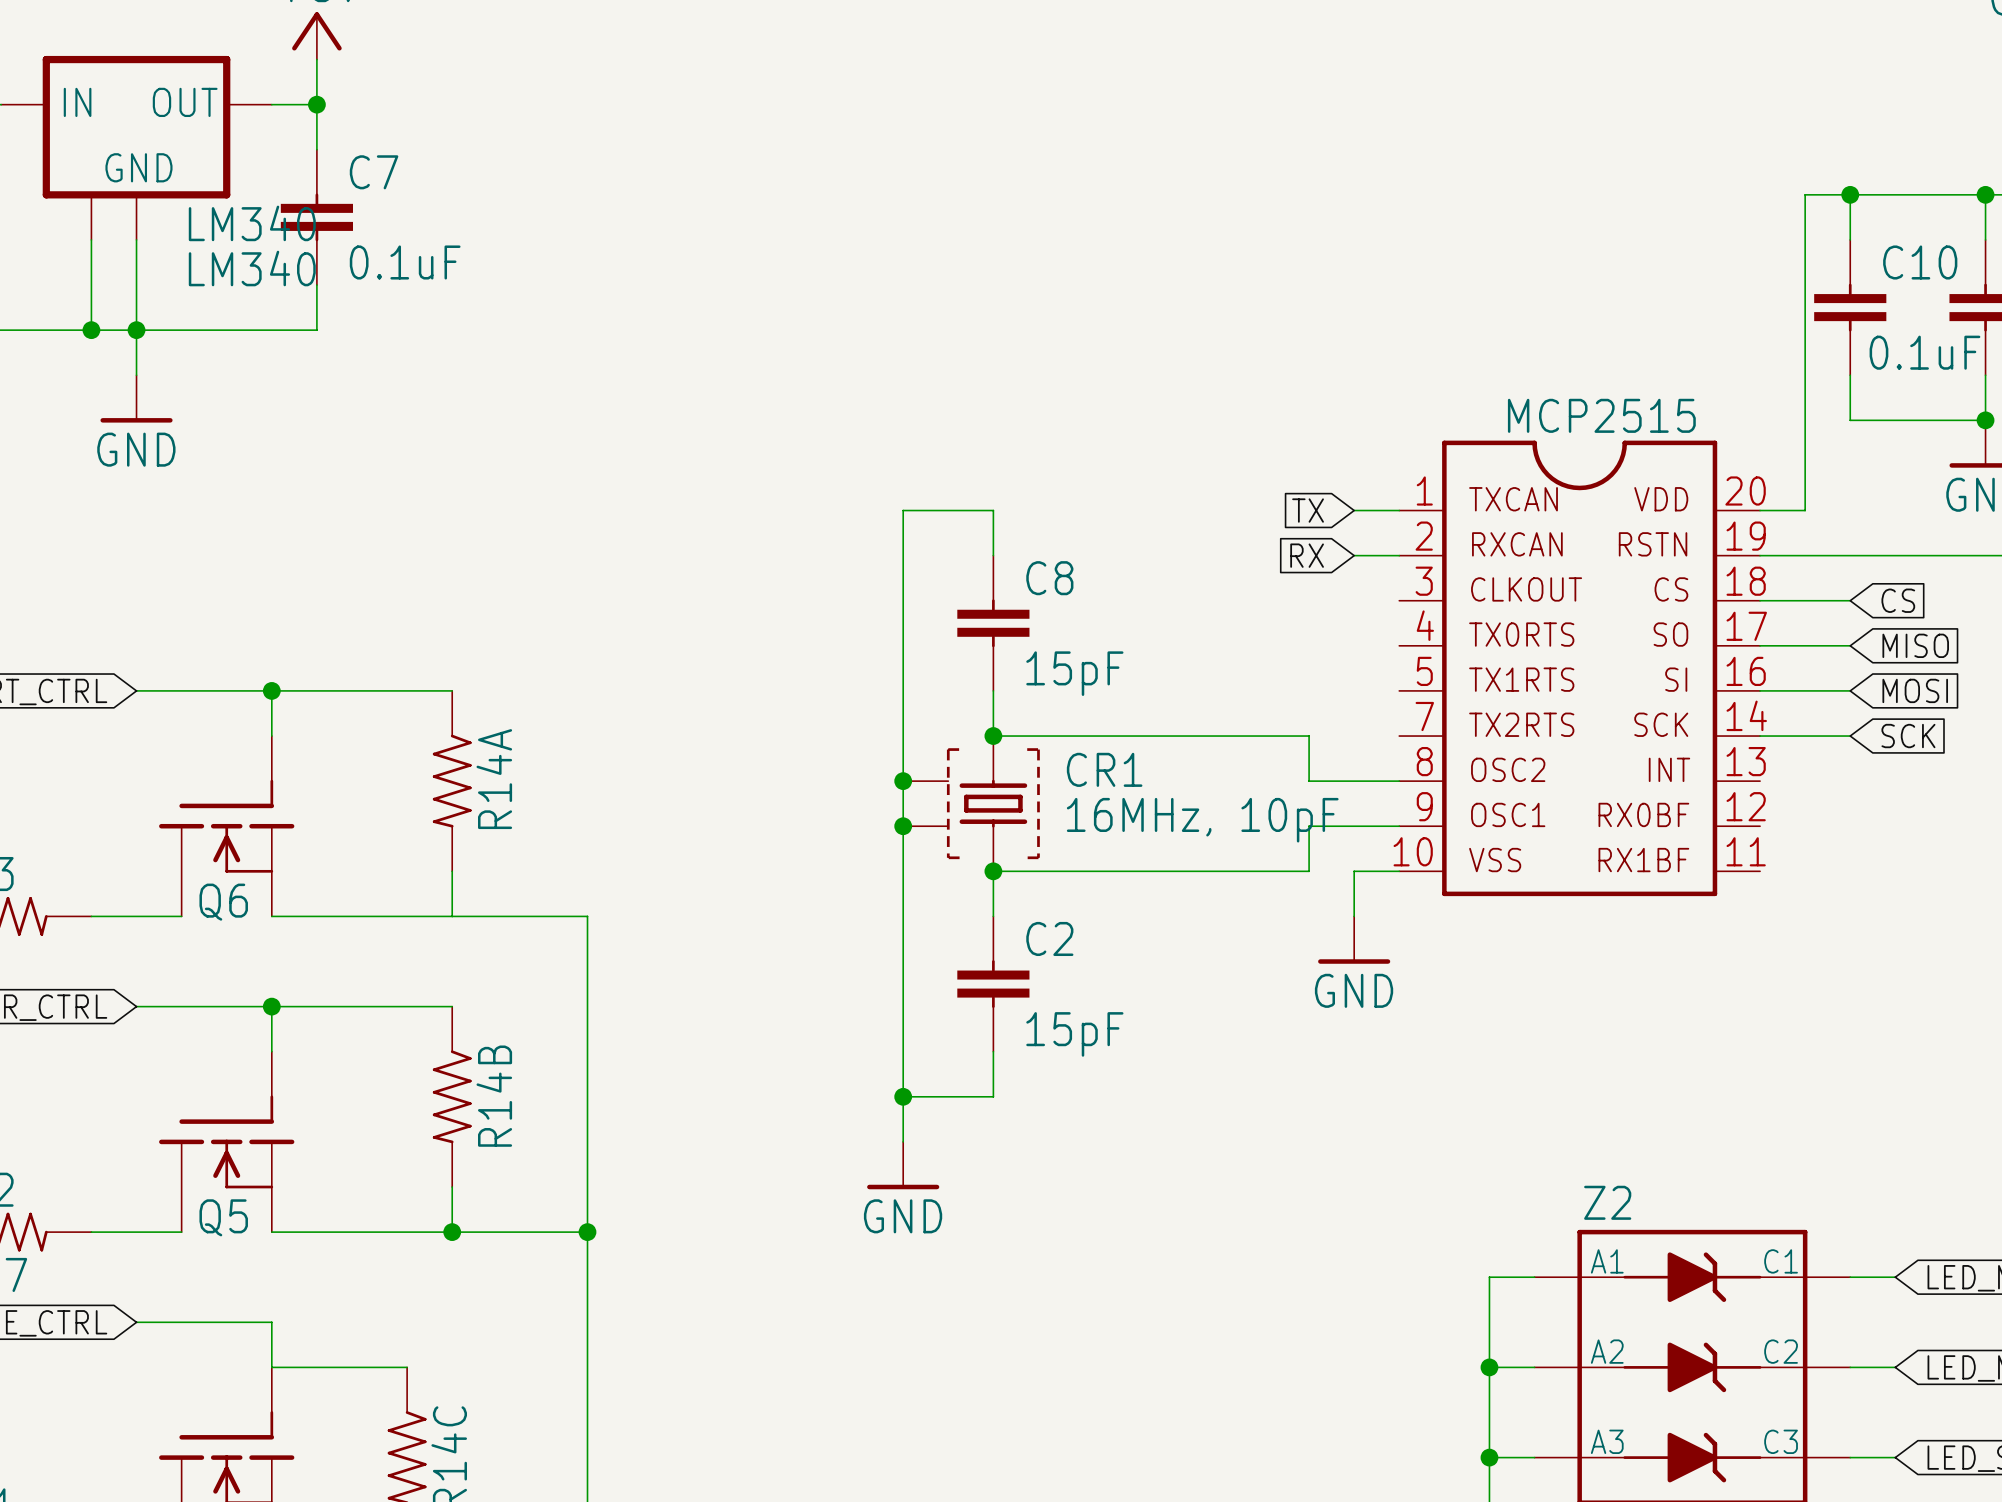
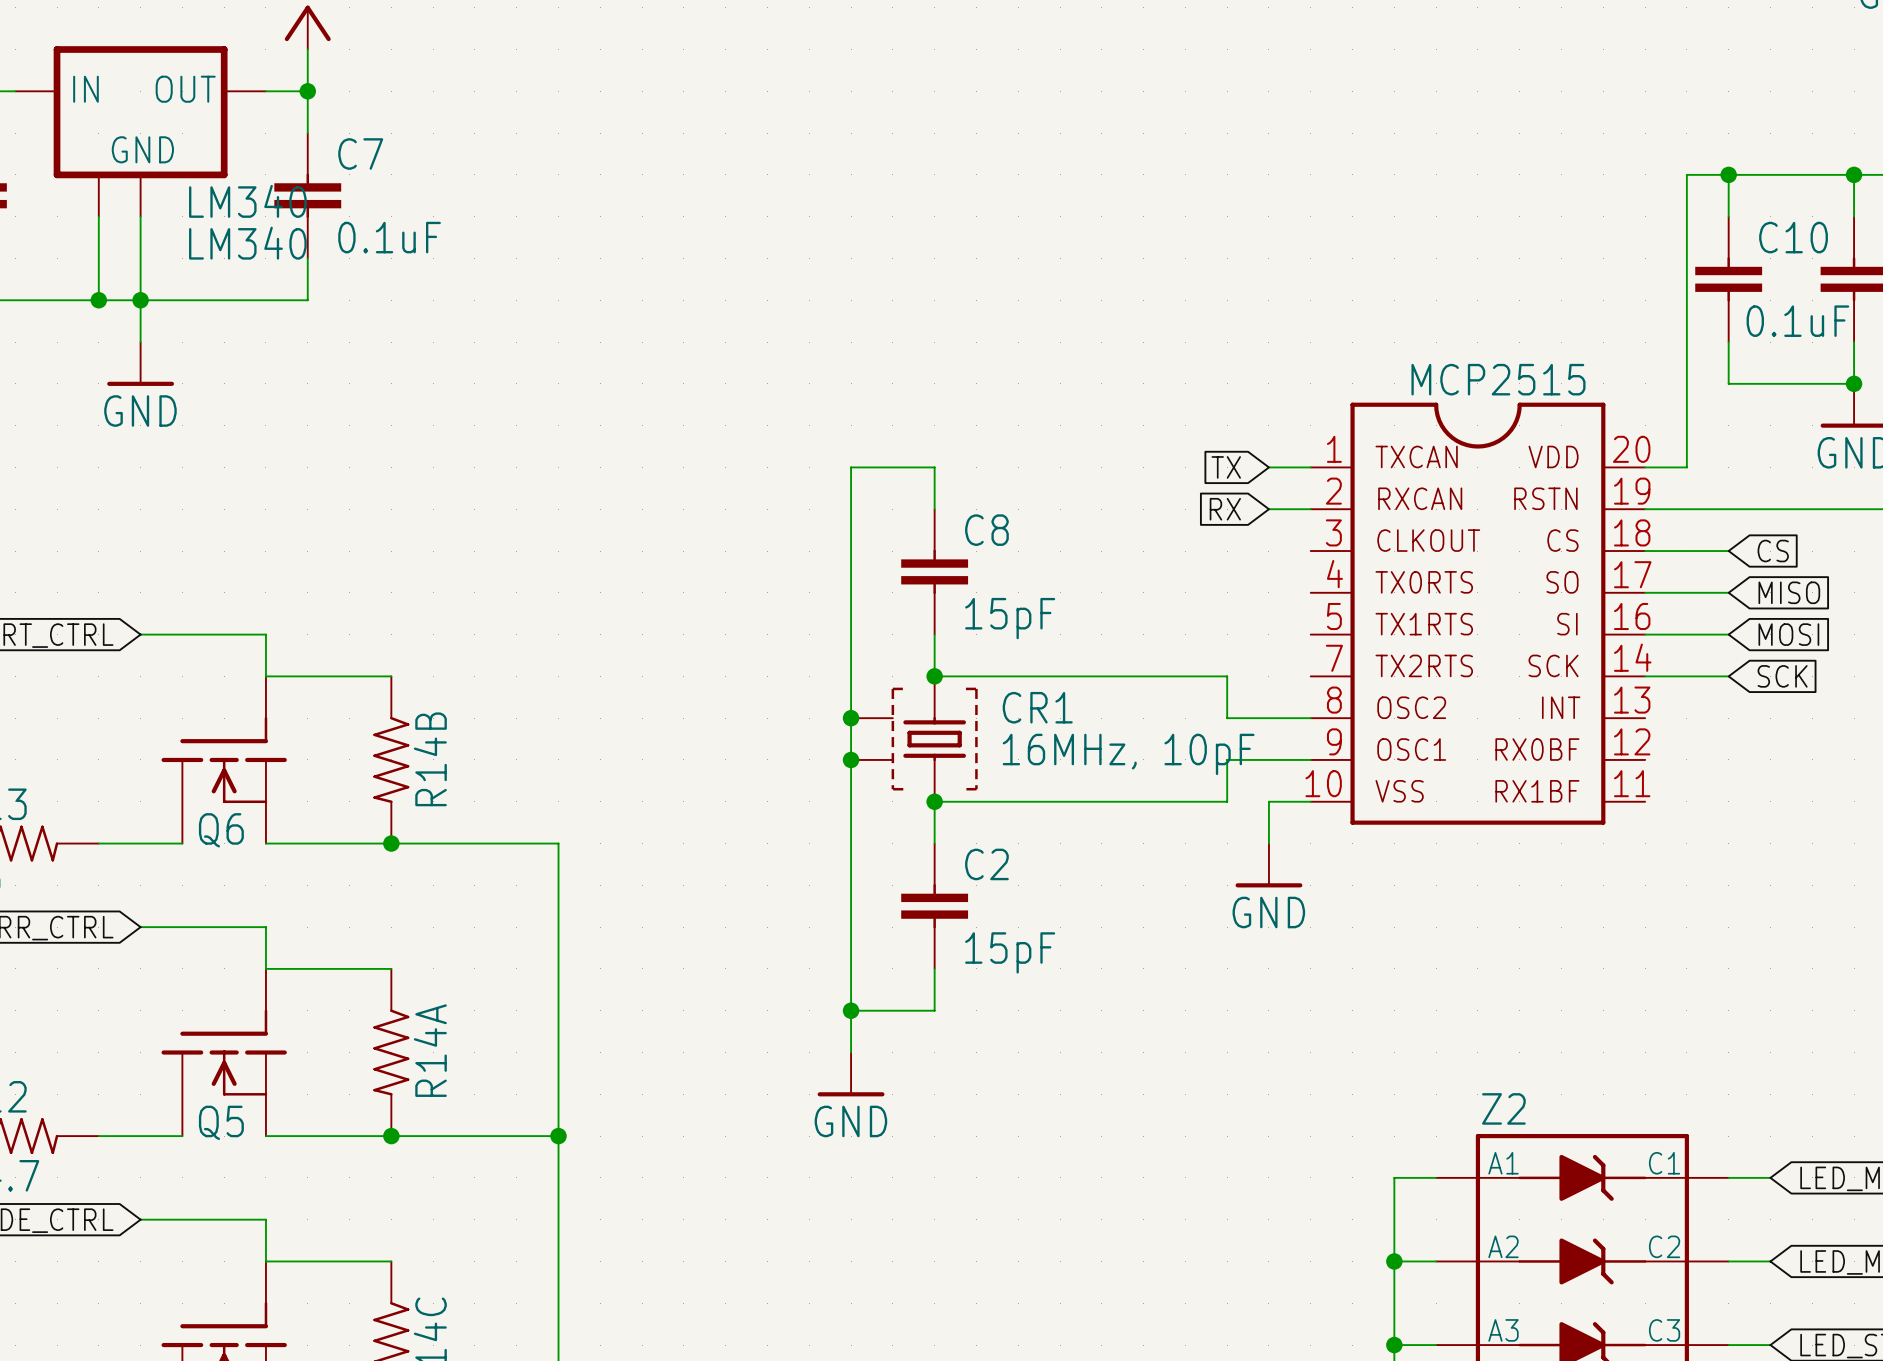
wire: (271, 690) (452, 690) -> none
junction: (271, 690) -> none
wire: none -> (265, 676) (391, 676)
R14A position: (452, 781) -> (391, 1052)
wire: (452, 871) (452, 916) -> none
junction: none -> (391, 843)
wire: (271, 1006) (452, 1006) -> none
junction: (271, 1006) -> none
wire: none -> (265, 968) (391, 968)
R14B position: (452, 1096) -> (391, 759)
wire: (452, 1187) (452, 1232) -> none
junction position: (452, 1232) -> (391, 1136)

